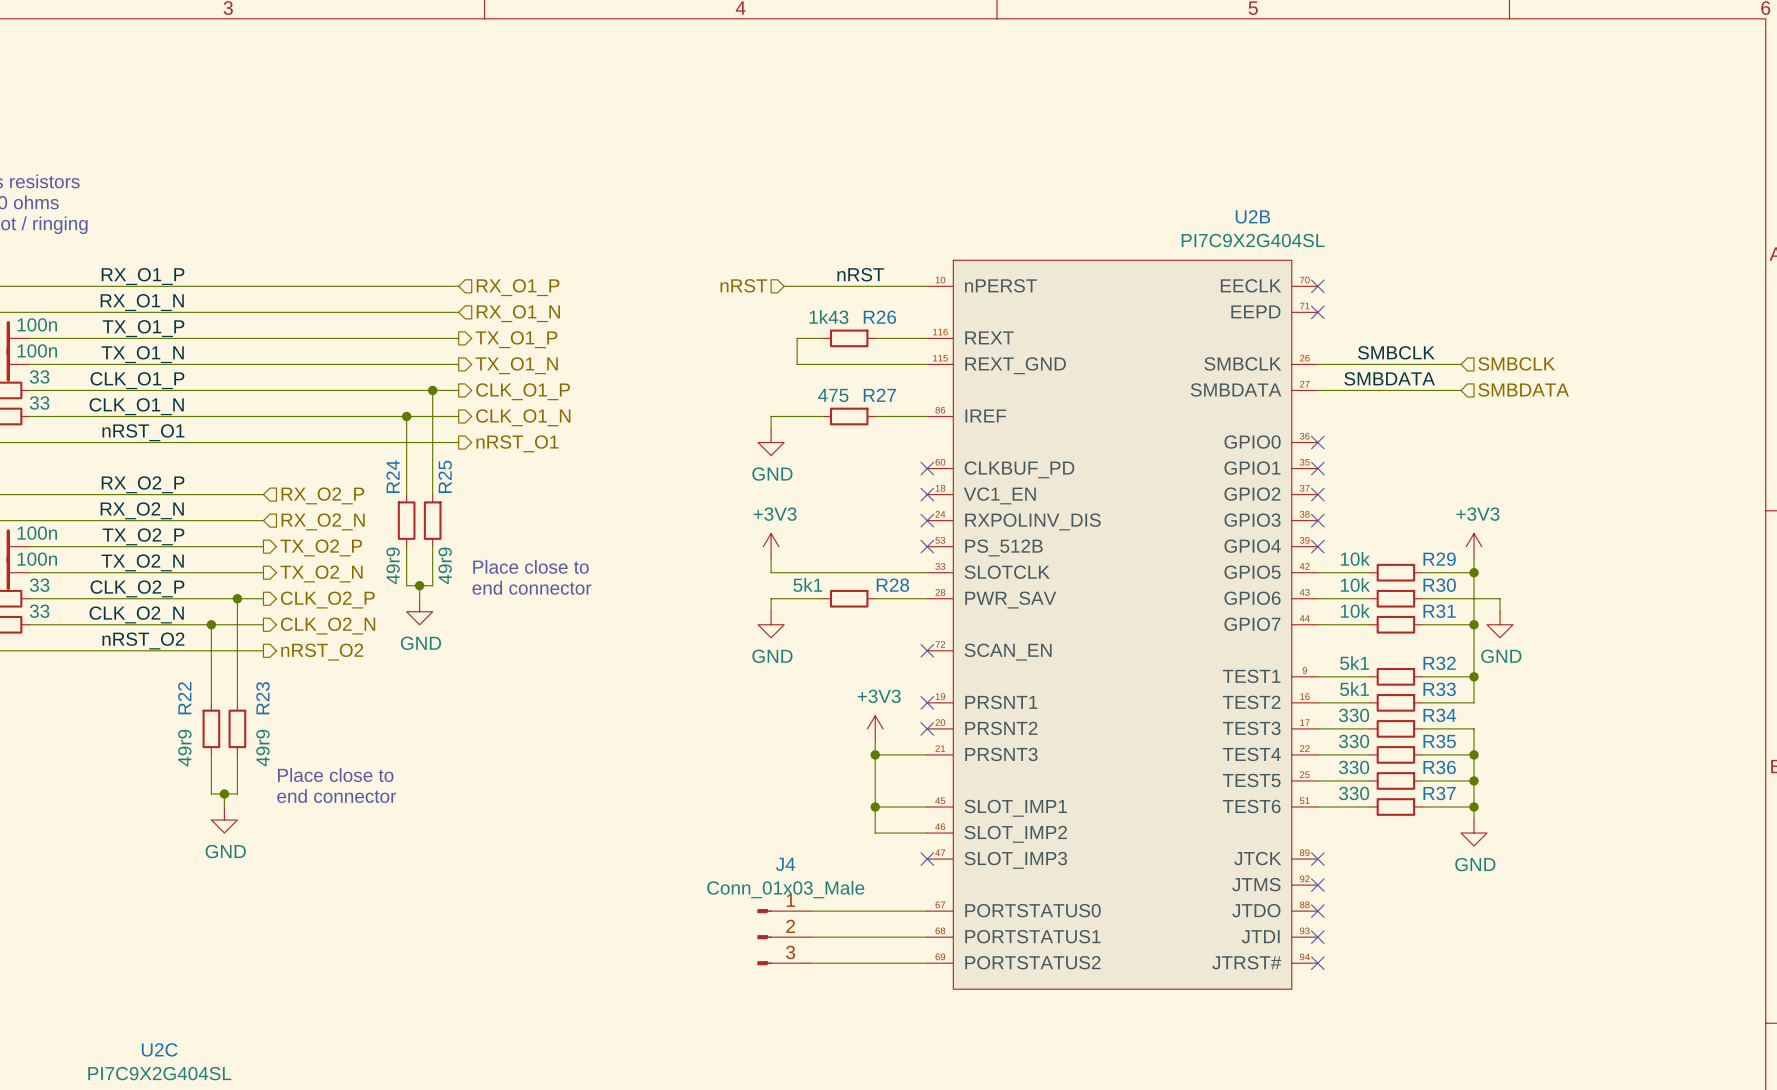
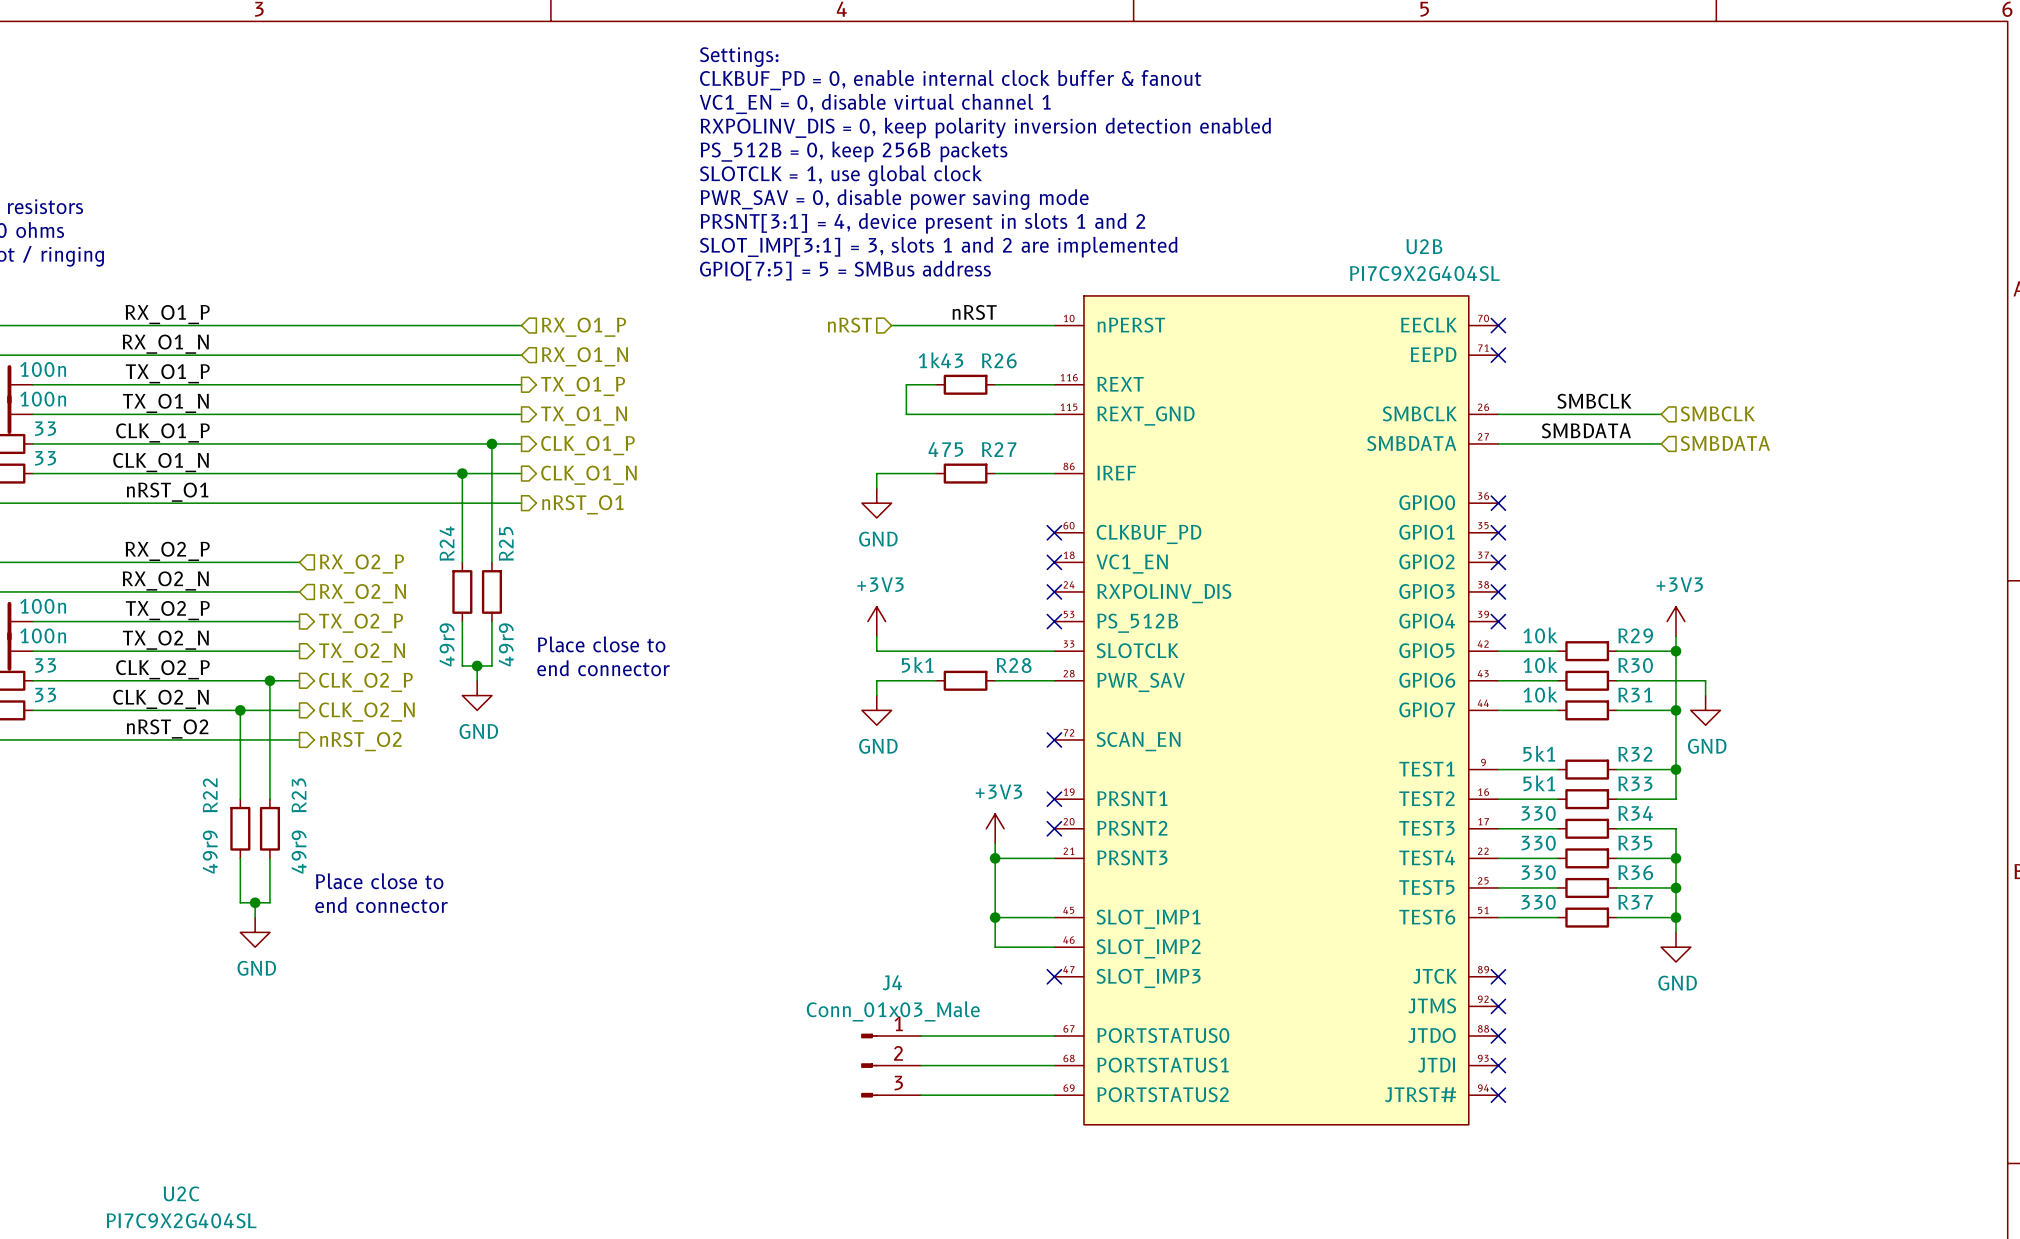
text: none -> Settings: (739, 57)
text: none -> CLKBUF_PD = 0, enable internal clock buffer & fanout (950, 80)
text: none -> VC1_EN = 0, disable virtual channel 1 (875, 103)
text: none -> RXPOLINV_DIS = 0, keep polarity inversion detection enabled (985, 128)
text: none -> PS_512B = 0, keep 256B packets (854, 151)
text: none -> SLOTCLK = 1, use global clock (840, 175)
text: none -> PWR_SAV = 0, disable power saving mode (894, 199)
text: none -> PRSNT[3:1] = 4, device present in slots 1 and 2 (922, 223)
text: none -> SLOT_IMP[3:1] = 3, slots 1 and 2 are implemented (938, 247)
text: none -> GPIO[7:5] = 5 = SMBus address (845, 270)

